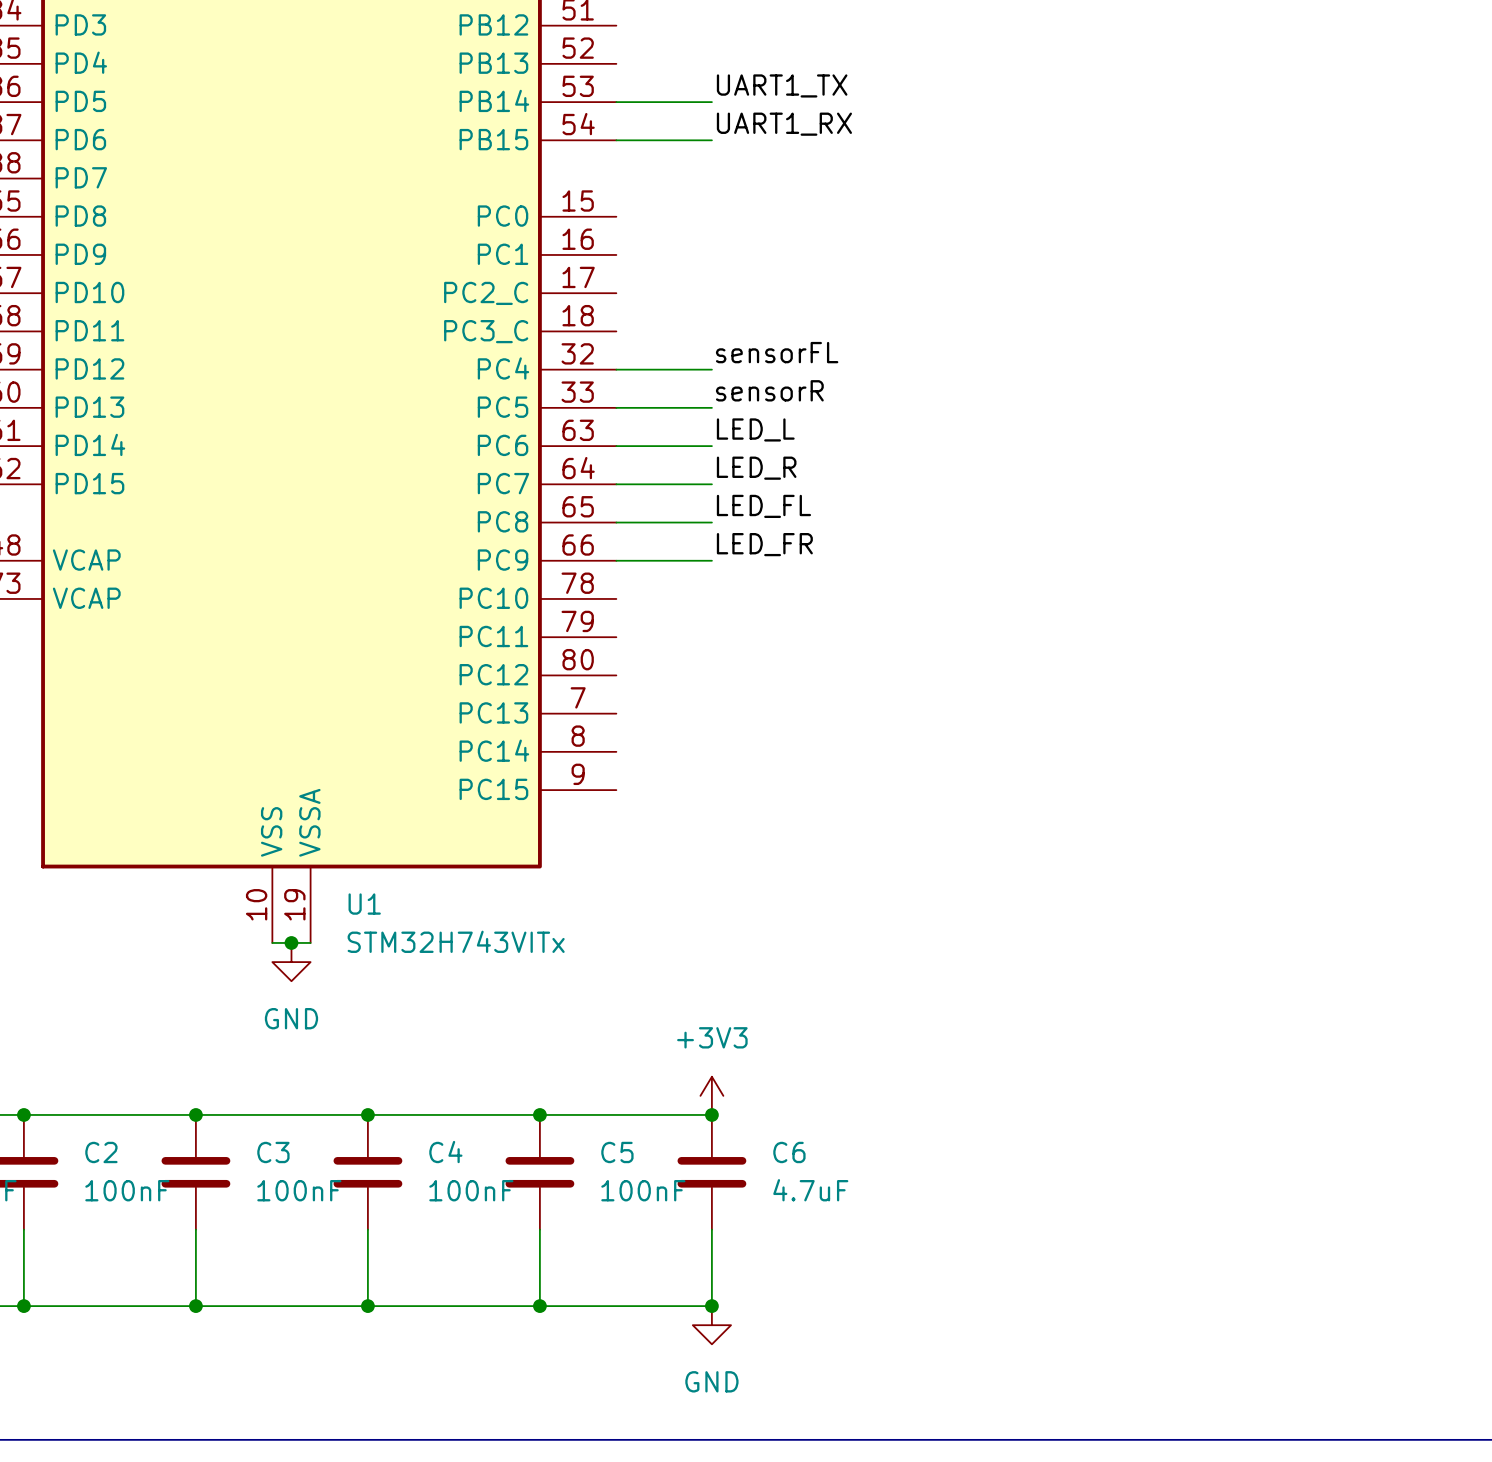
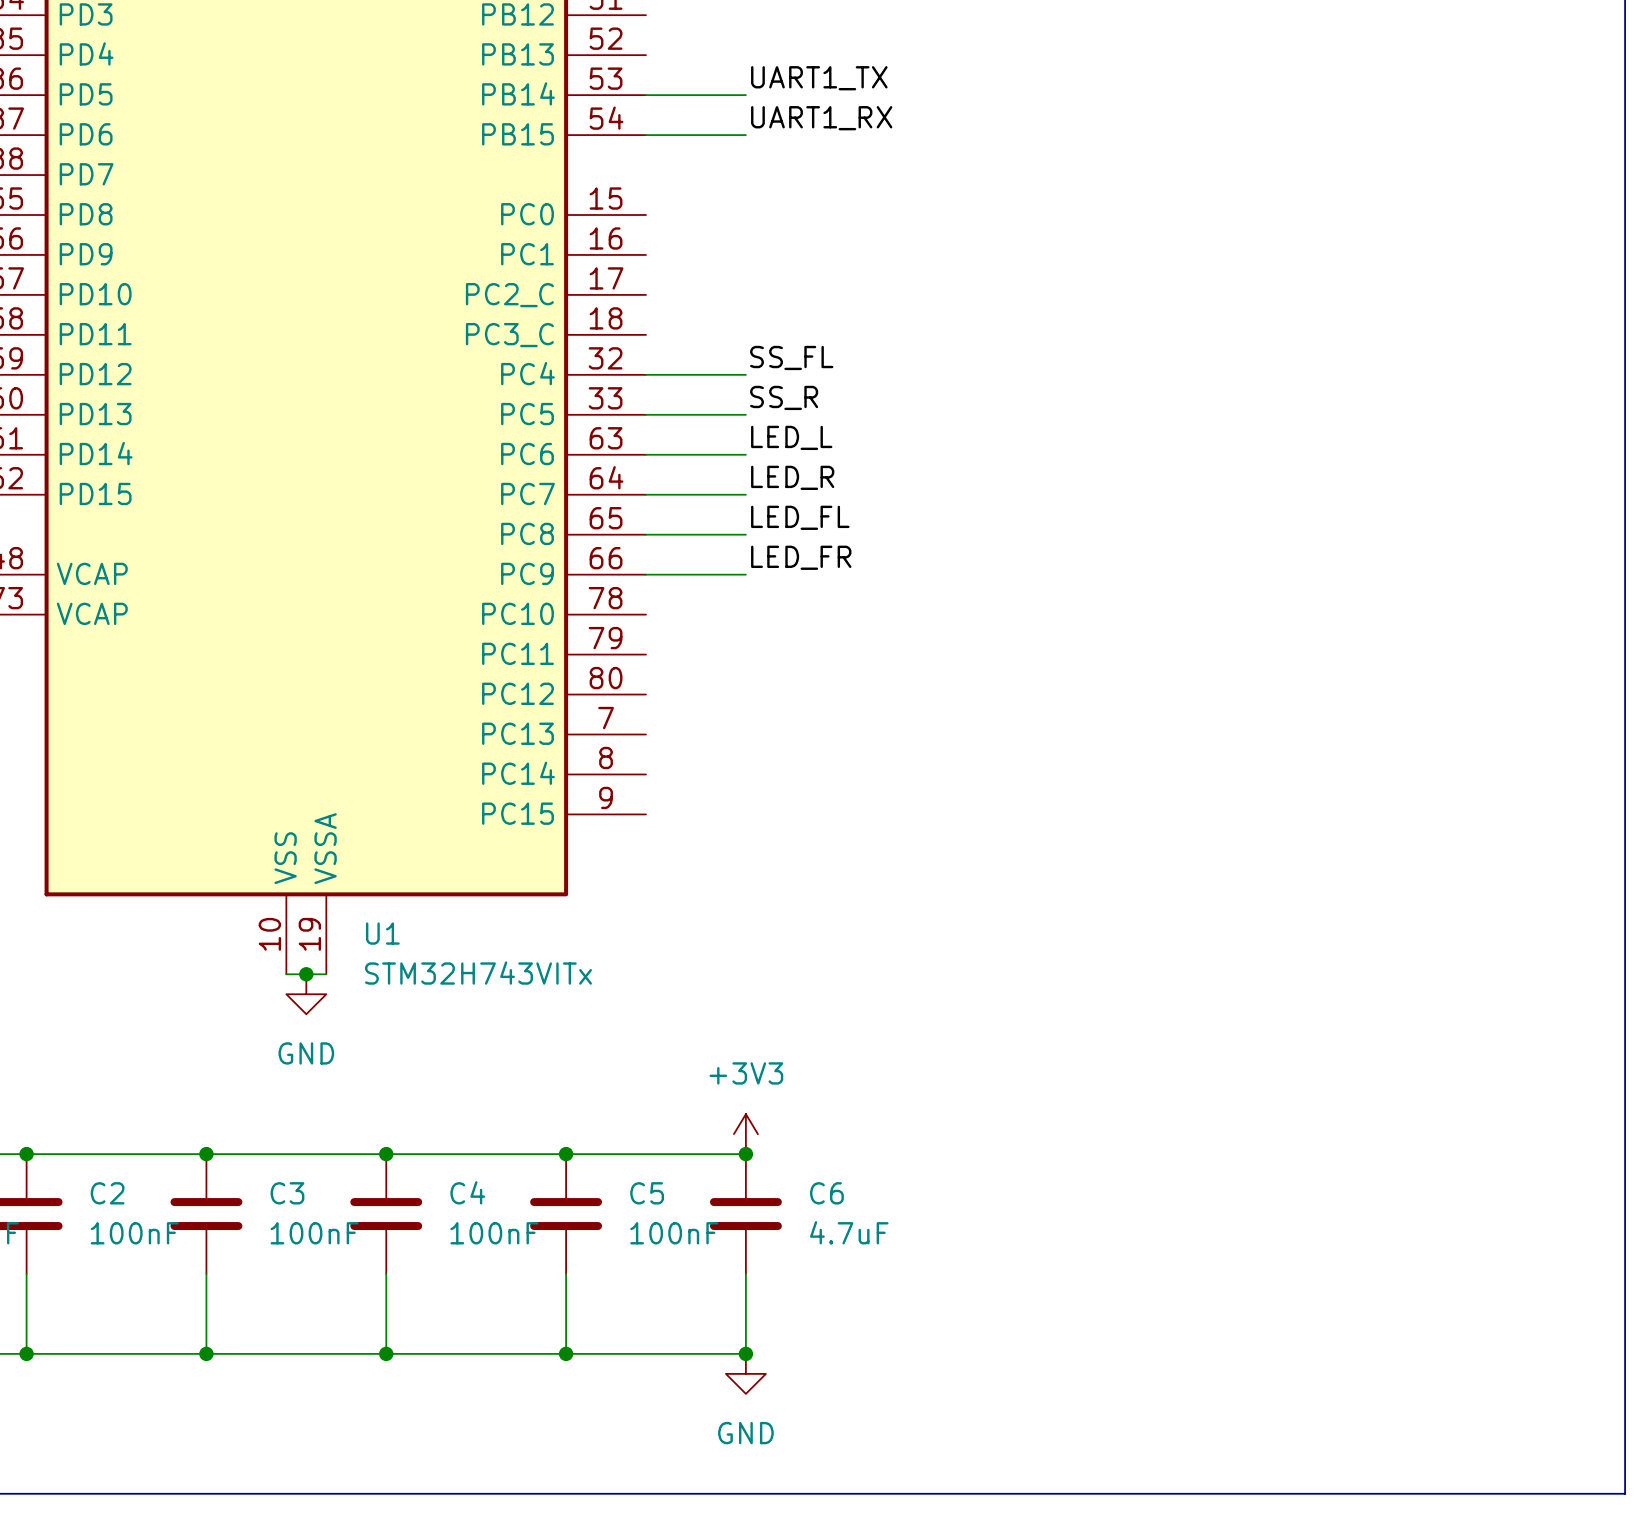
label: sensorFL (777, 352) -> SS_FL (791, 357)
label: sensorR (769, 390) -> SS_R (784, 397)

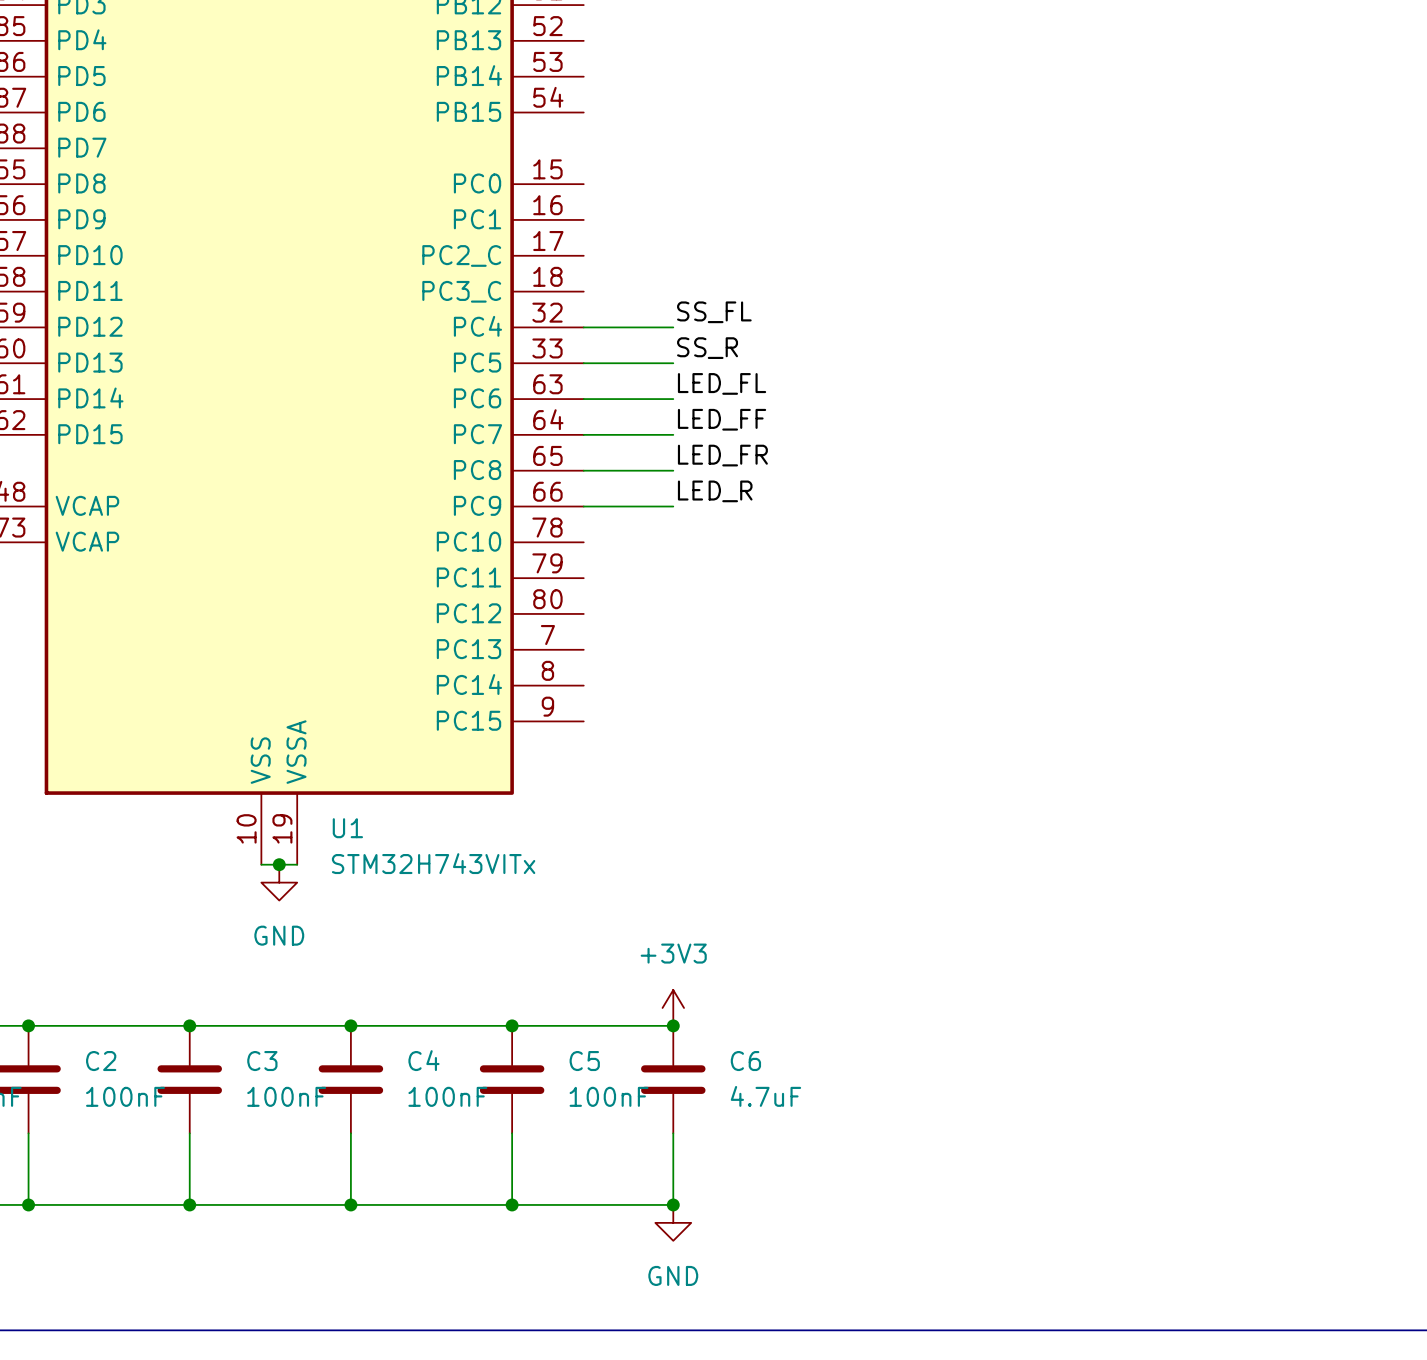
label: UART1_TX (819, 78) -> none
wire: (646, 95) (745, 95) -> none
label: UART1_RX (821, 118) -> none
wire: (646, 135) (745, 135) -> none
label: LED_L (791, 437) -> LED_FL (722, 383)
label: LED_R (792, 477) -> LED_FF (722, 419)
label: LED_FL (800, 517) -> LED_FR (722, 455)
label: LED_FR (801, 557) -> LED_R (715, 491)

